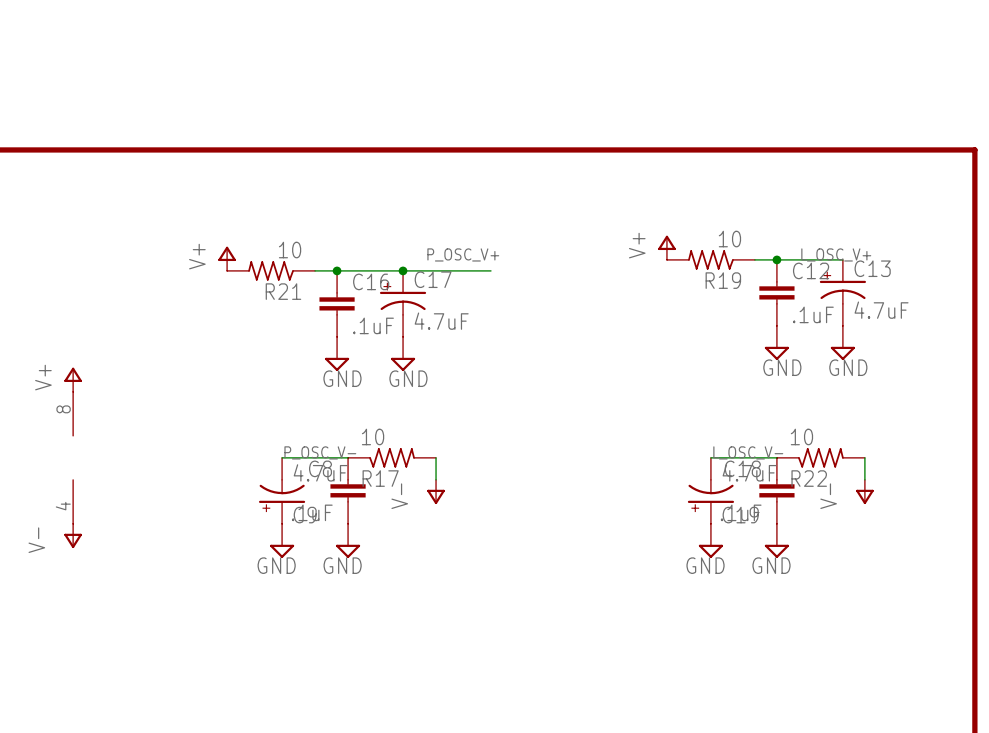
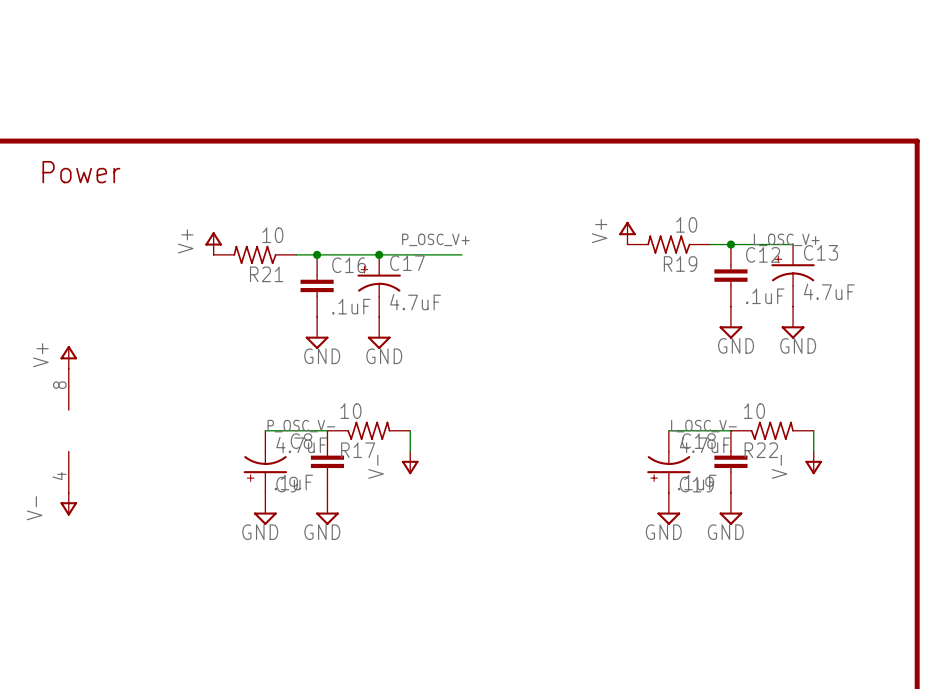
text: none -> Power (81, 172)

